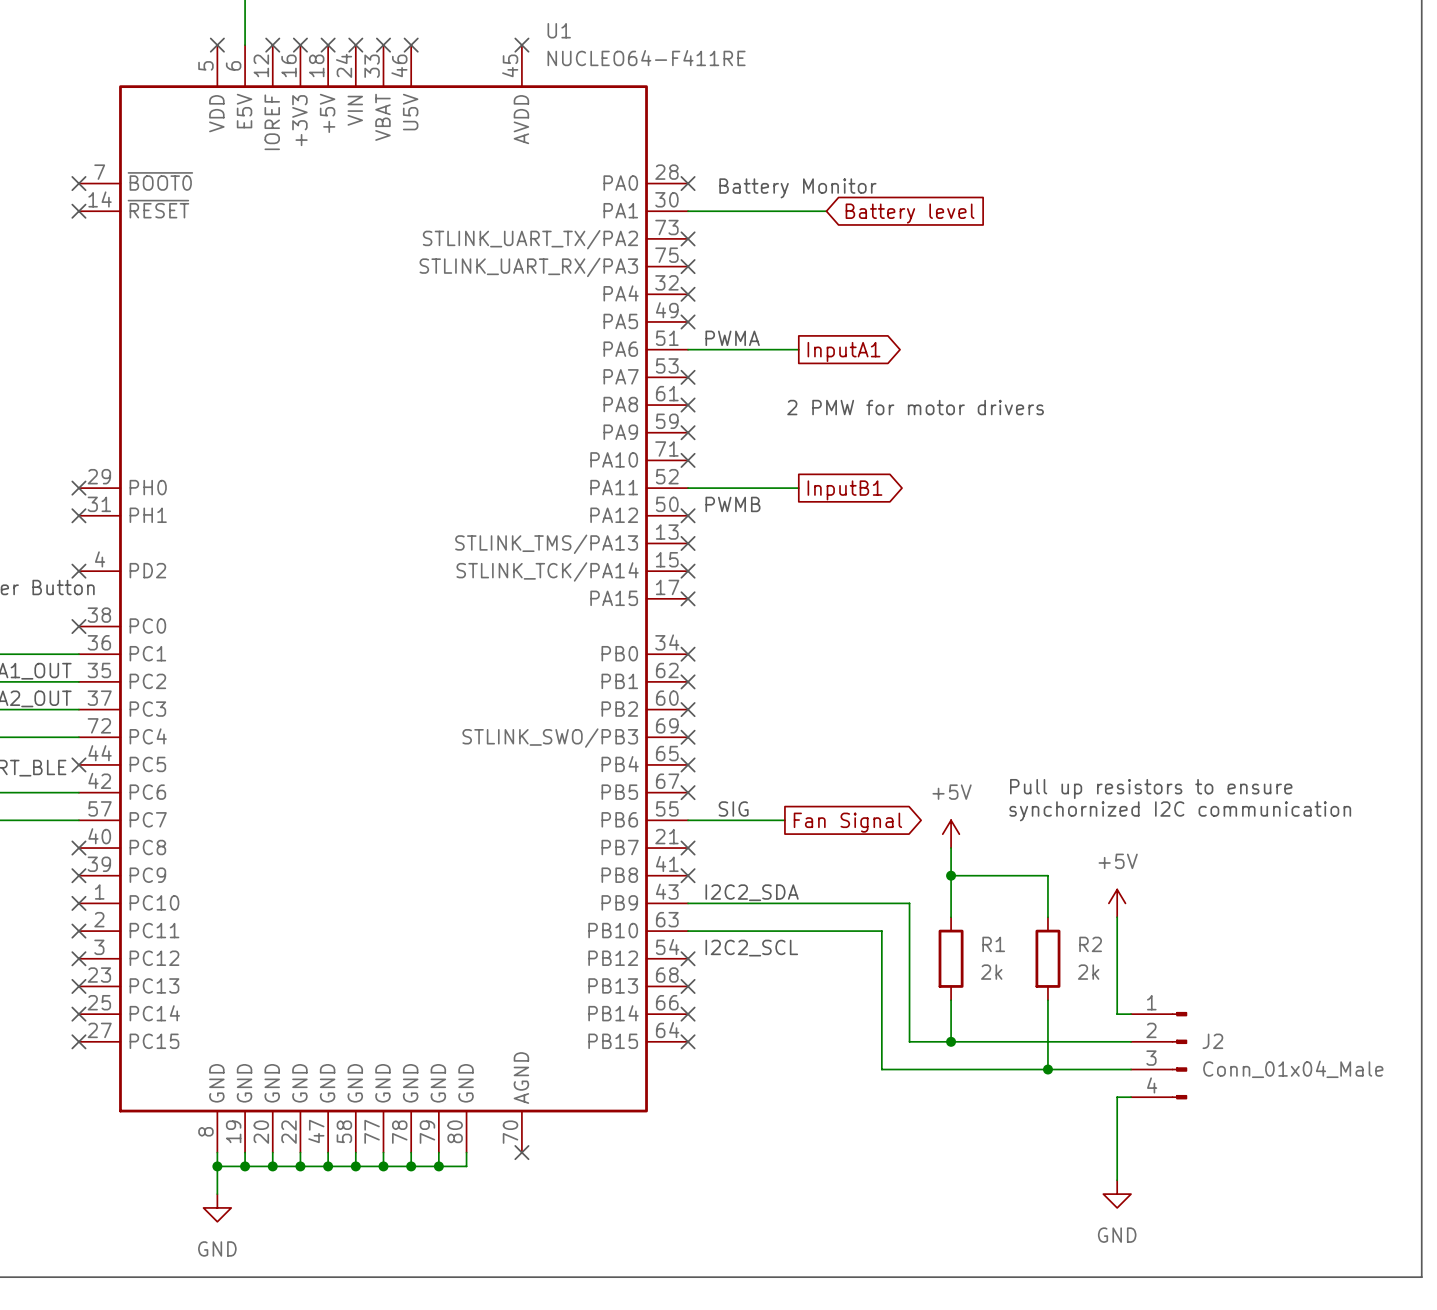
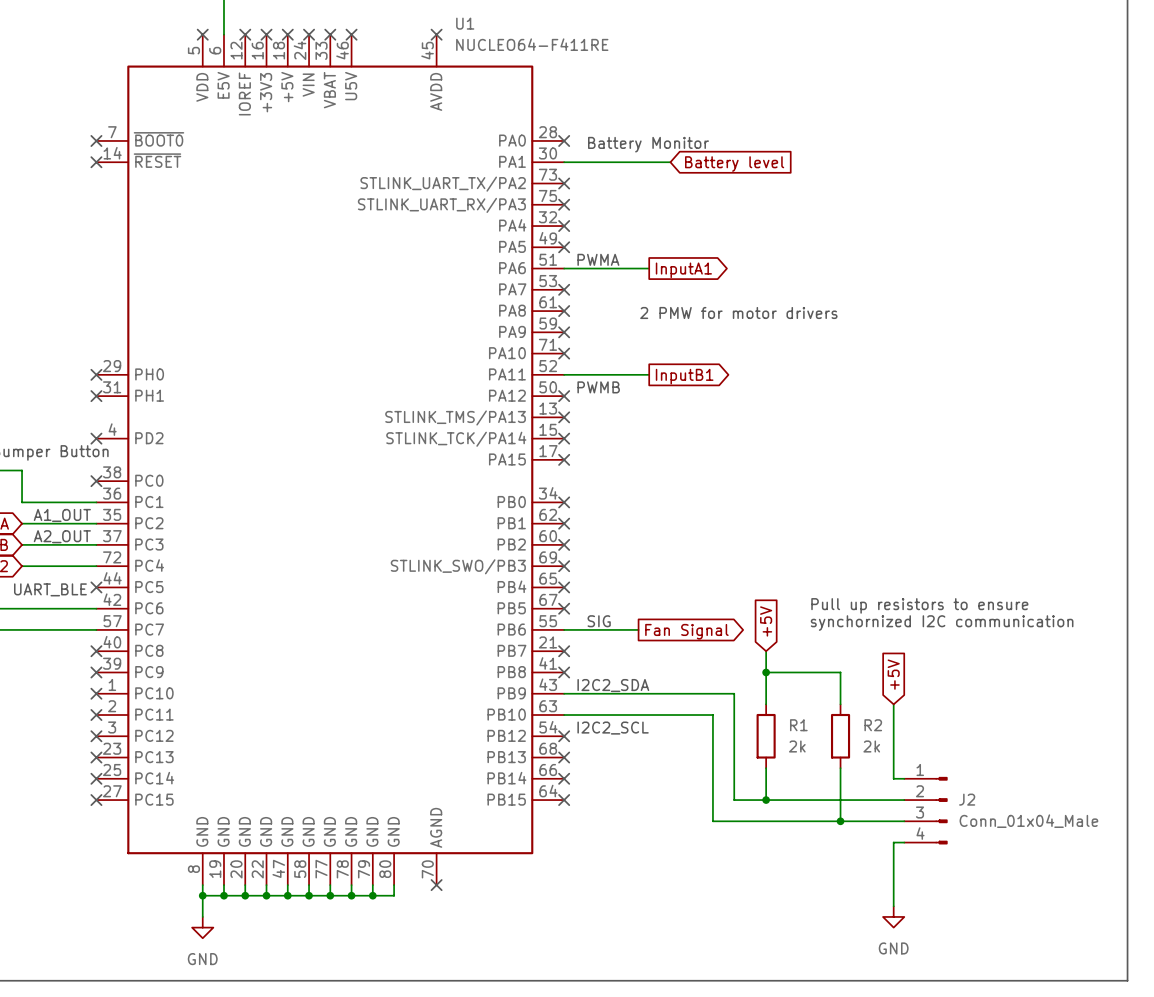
global label: none -> +5V (766, 621)
power symbol: +5V (951, 834) -> none
global label: none -> +5V (893, 674)
power symbol: +5V (1117, 903) -> none

